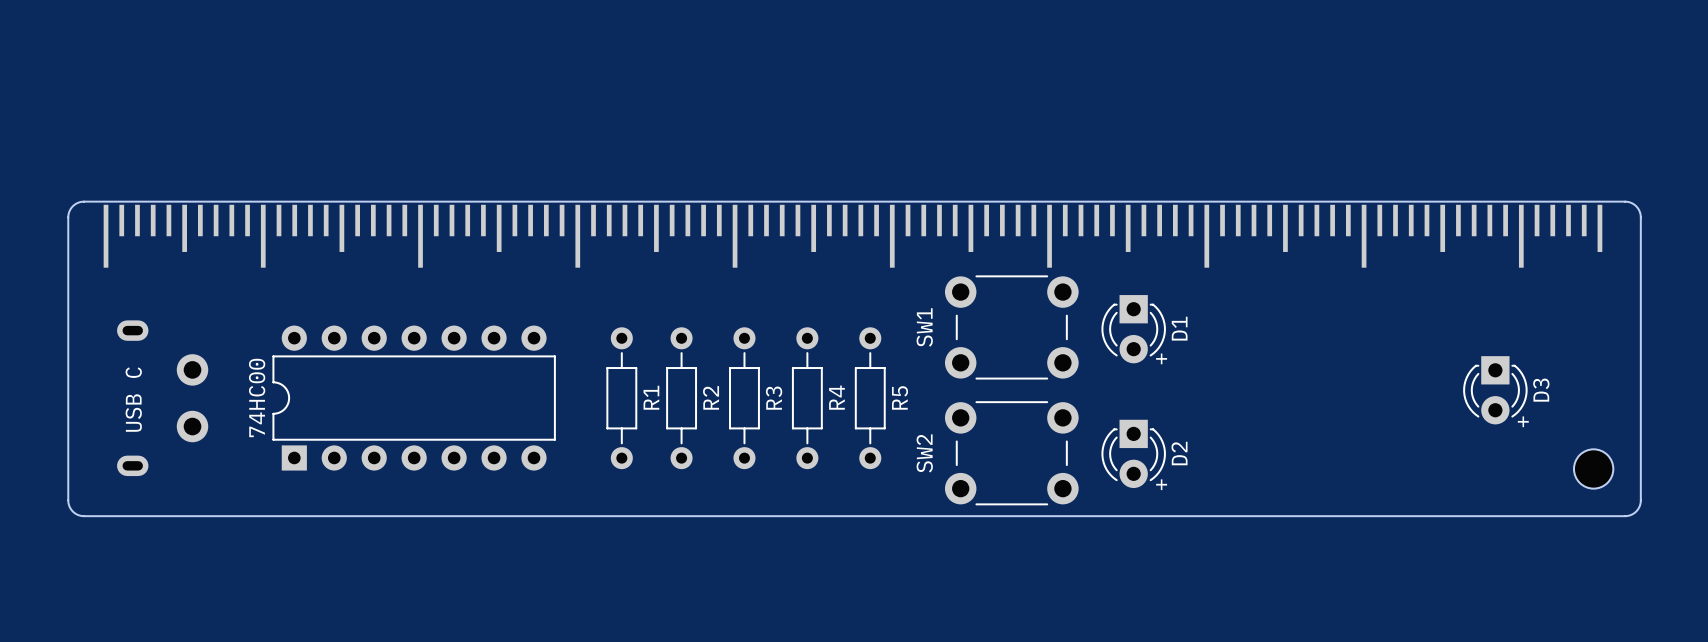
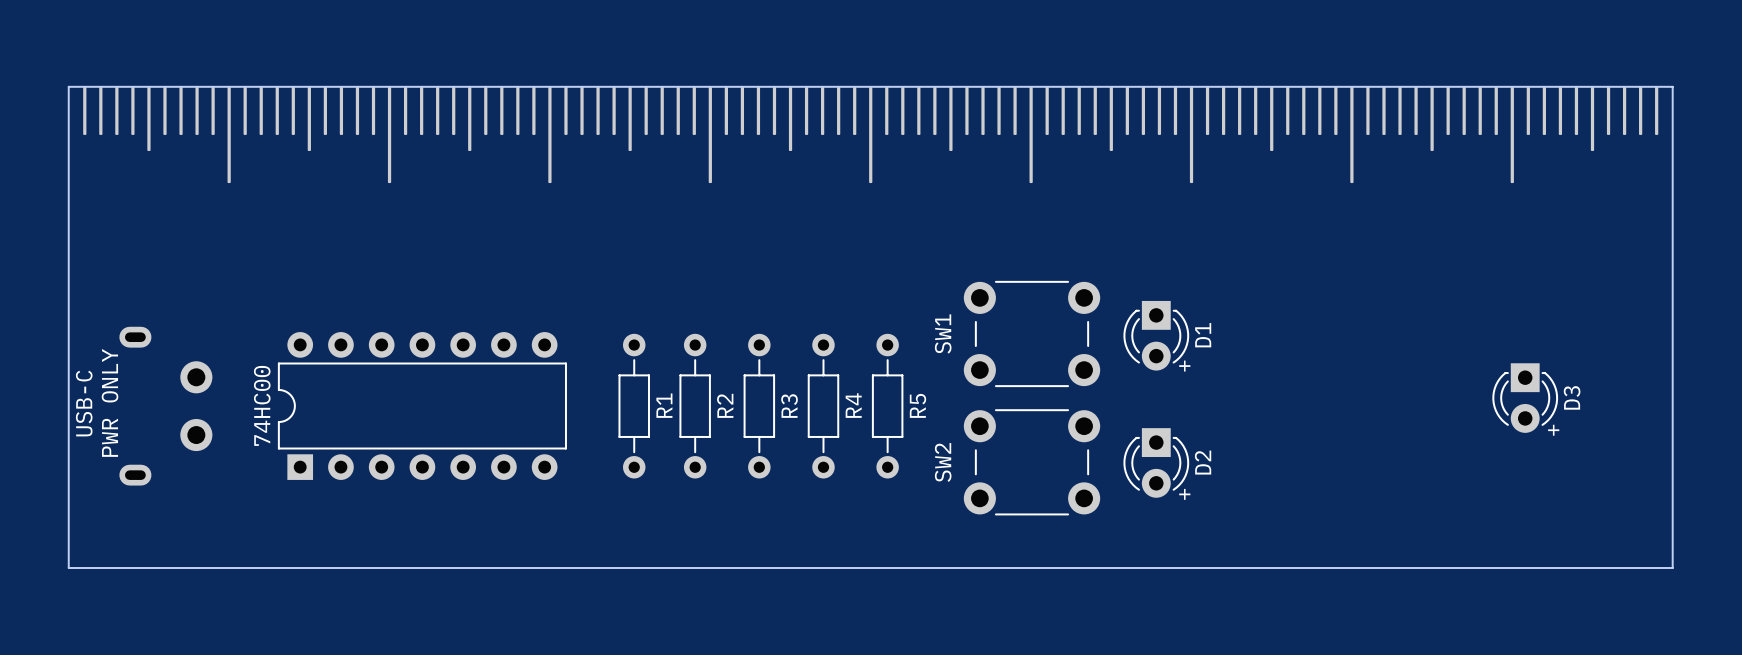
part: none -> (870, 134)
board edge: (84, 201) (1628, 202) (1637, 207) (1640, 217) (1640, 503) (1634, 512) (1625, 516) (80, 515) (71, 510) (68, 500) (68, 217) (72, 206) (84, 201) -> (68, 86) (68, 568) (1672, 568) (1672, 86) (68, 86)
part: (852, 236) -> none
text: none -> USB-C (84, 403)
text: none -> PWR ONLY (110, 402)
USB C name: USB C (133, 399) -> none
part: (1593, 468) -> none

